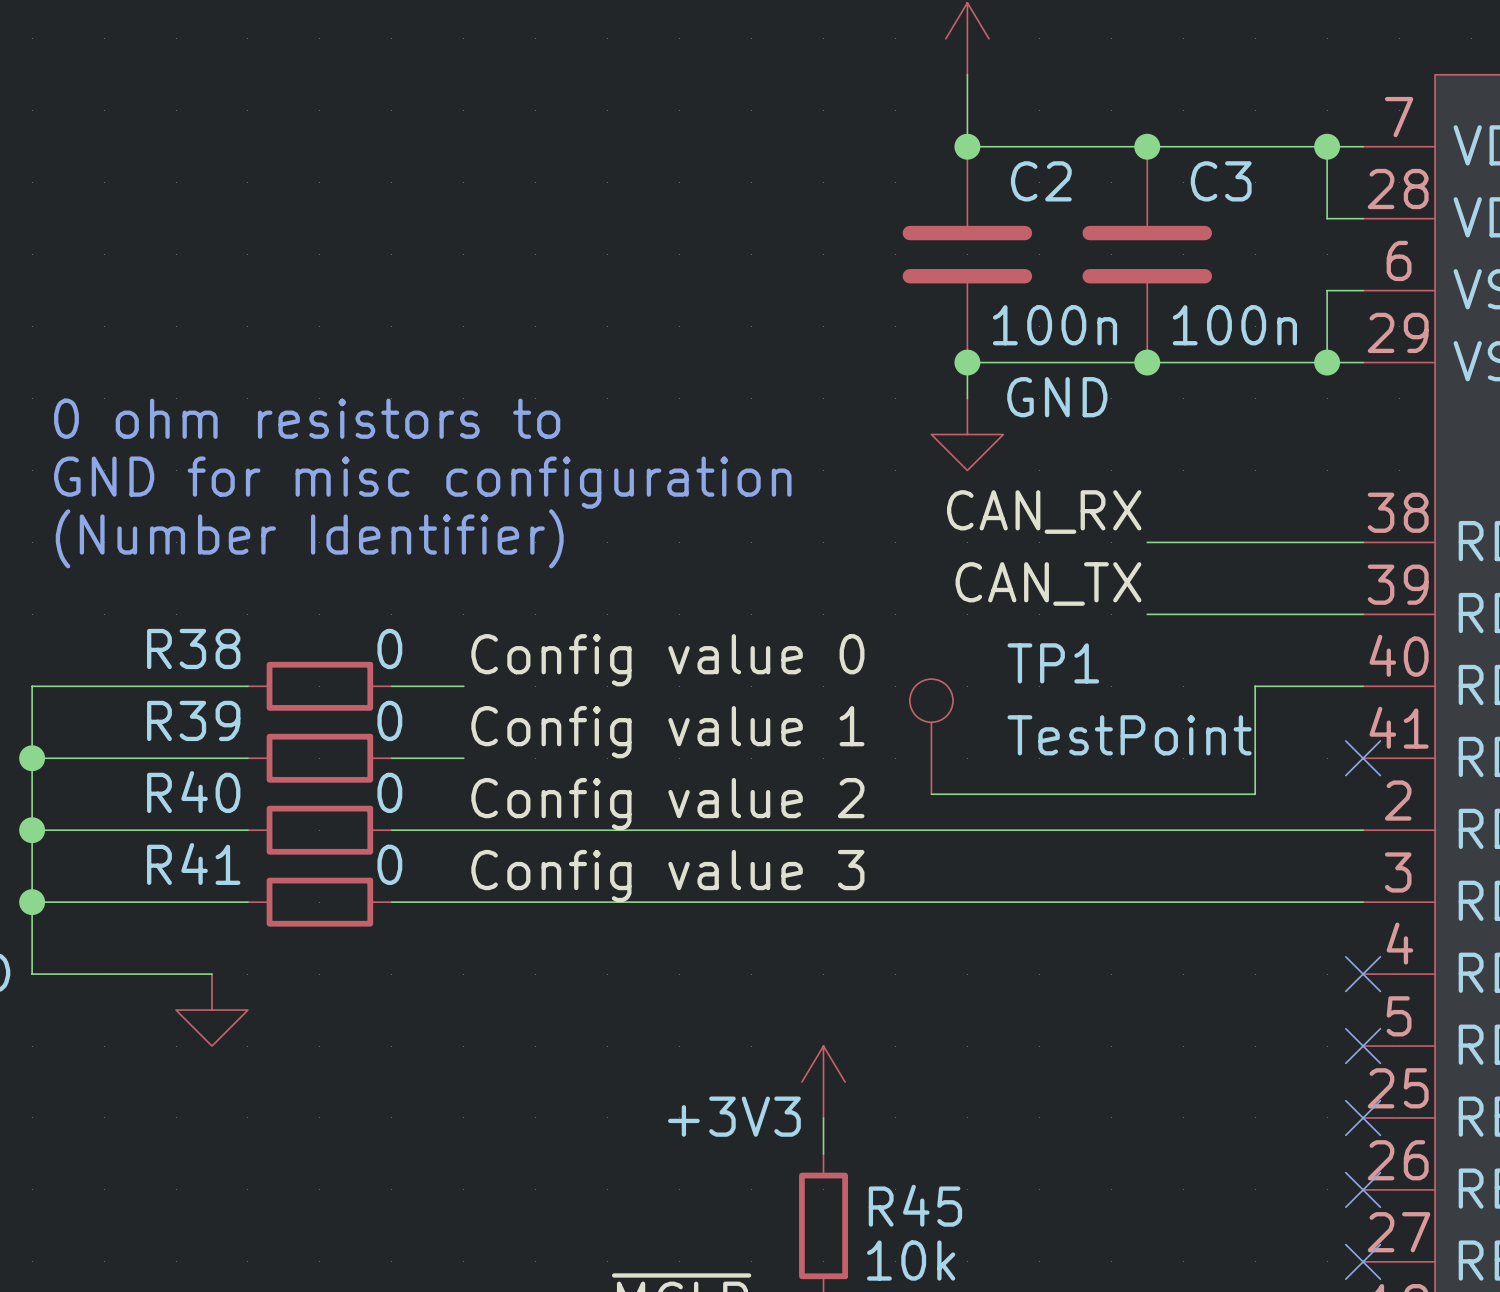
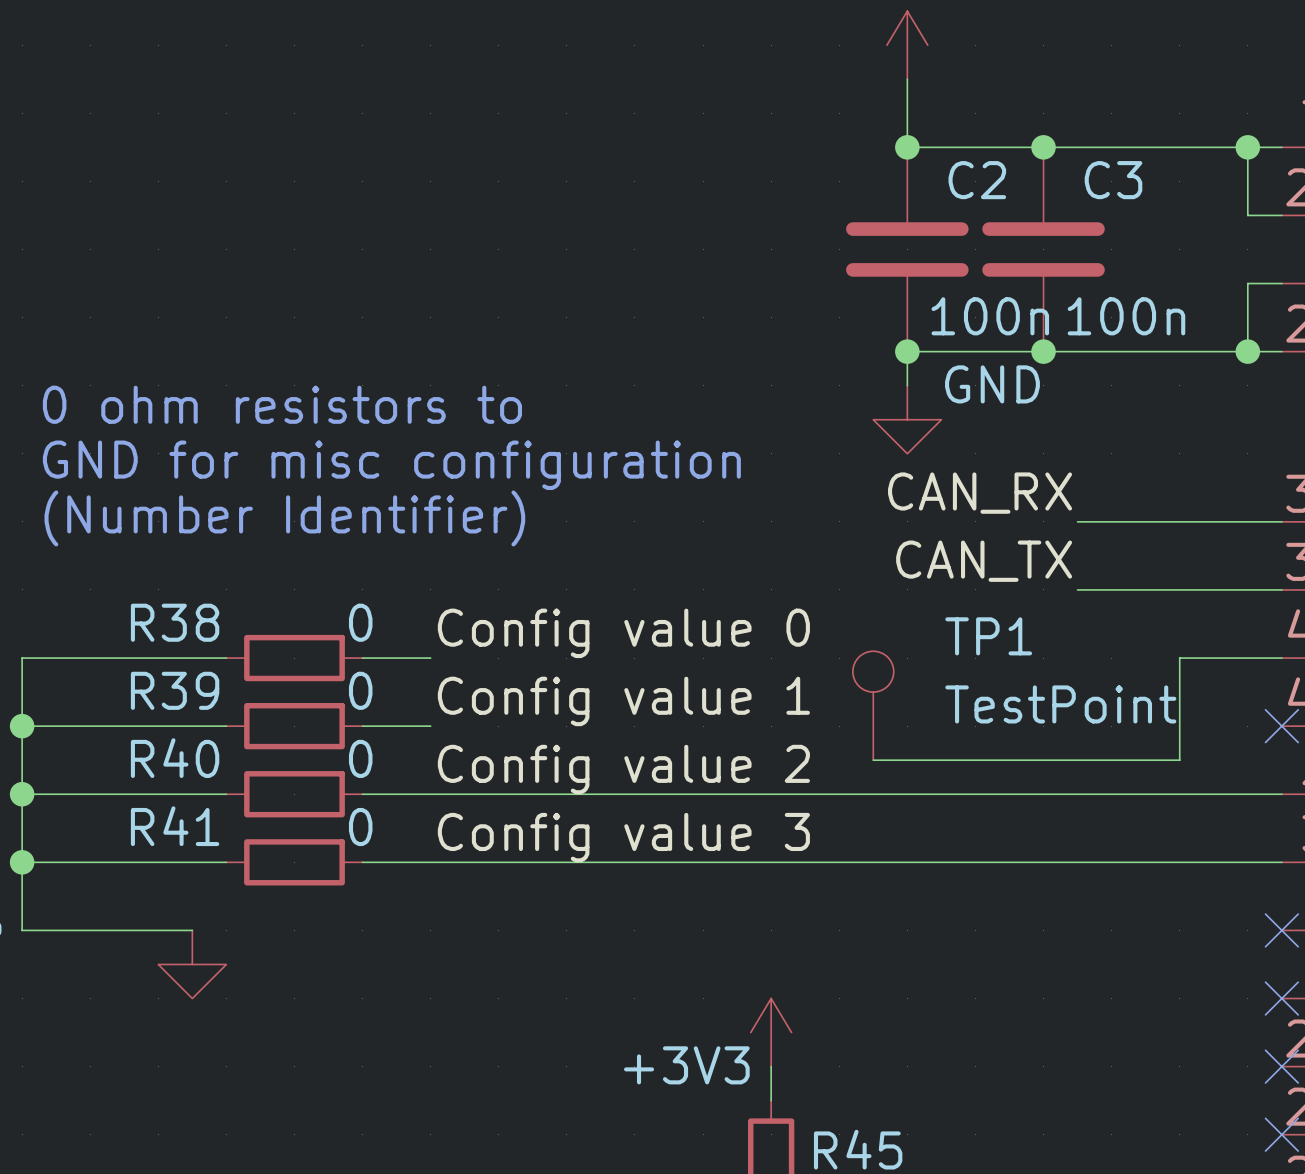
junction position: (1147, 146) -> (1043, 147)
C3 position: (1147, 254) -> (1043, 249)
junction position: (1147, 362) -> (1043, 351)

